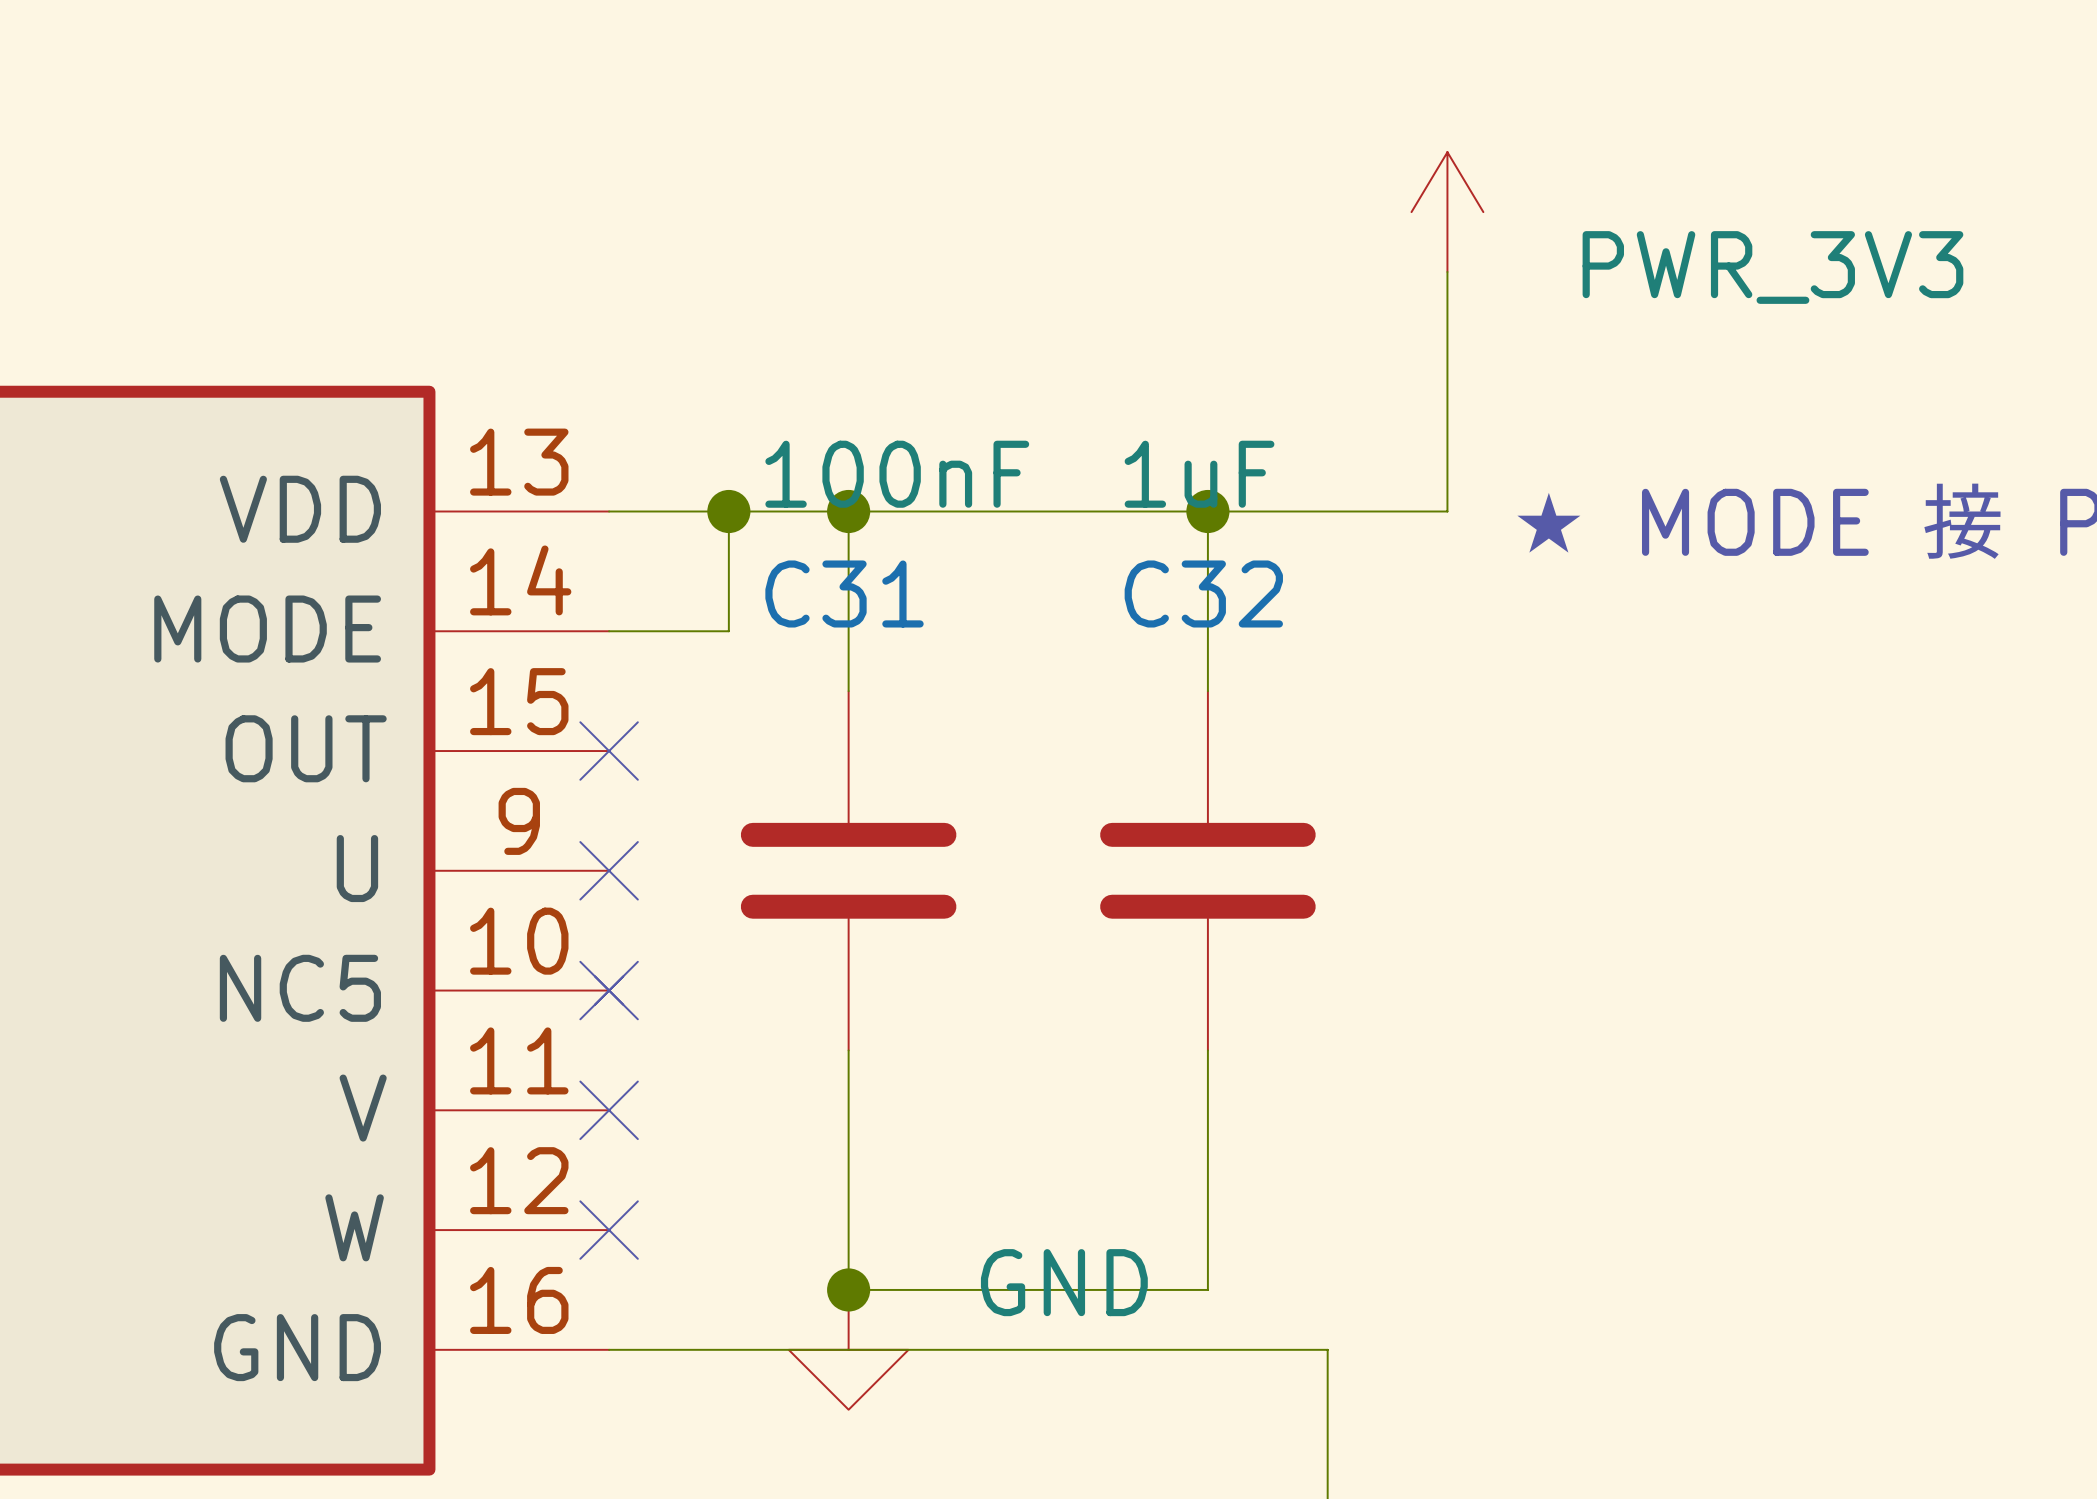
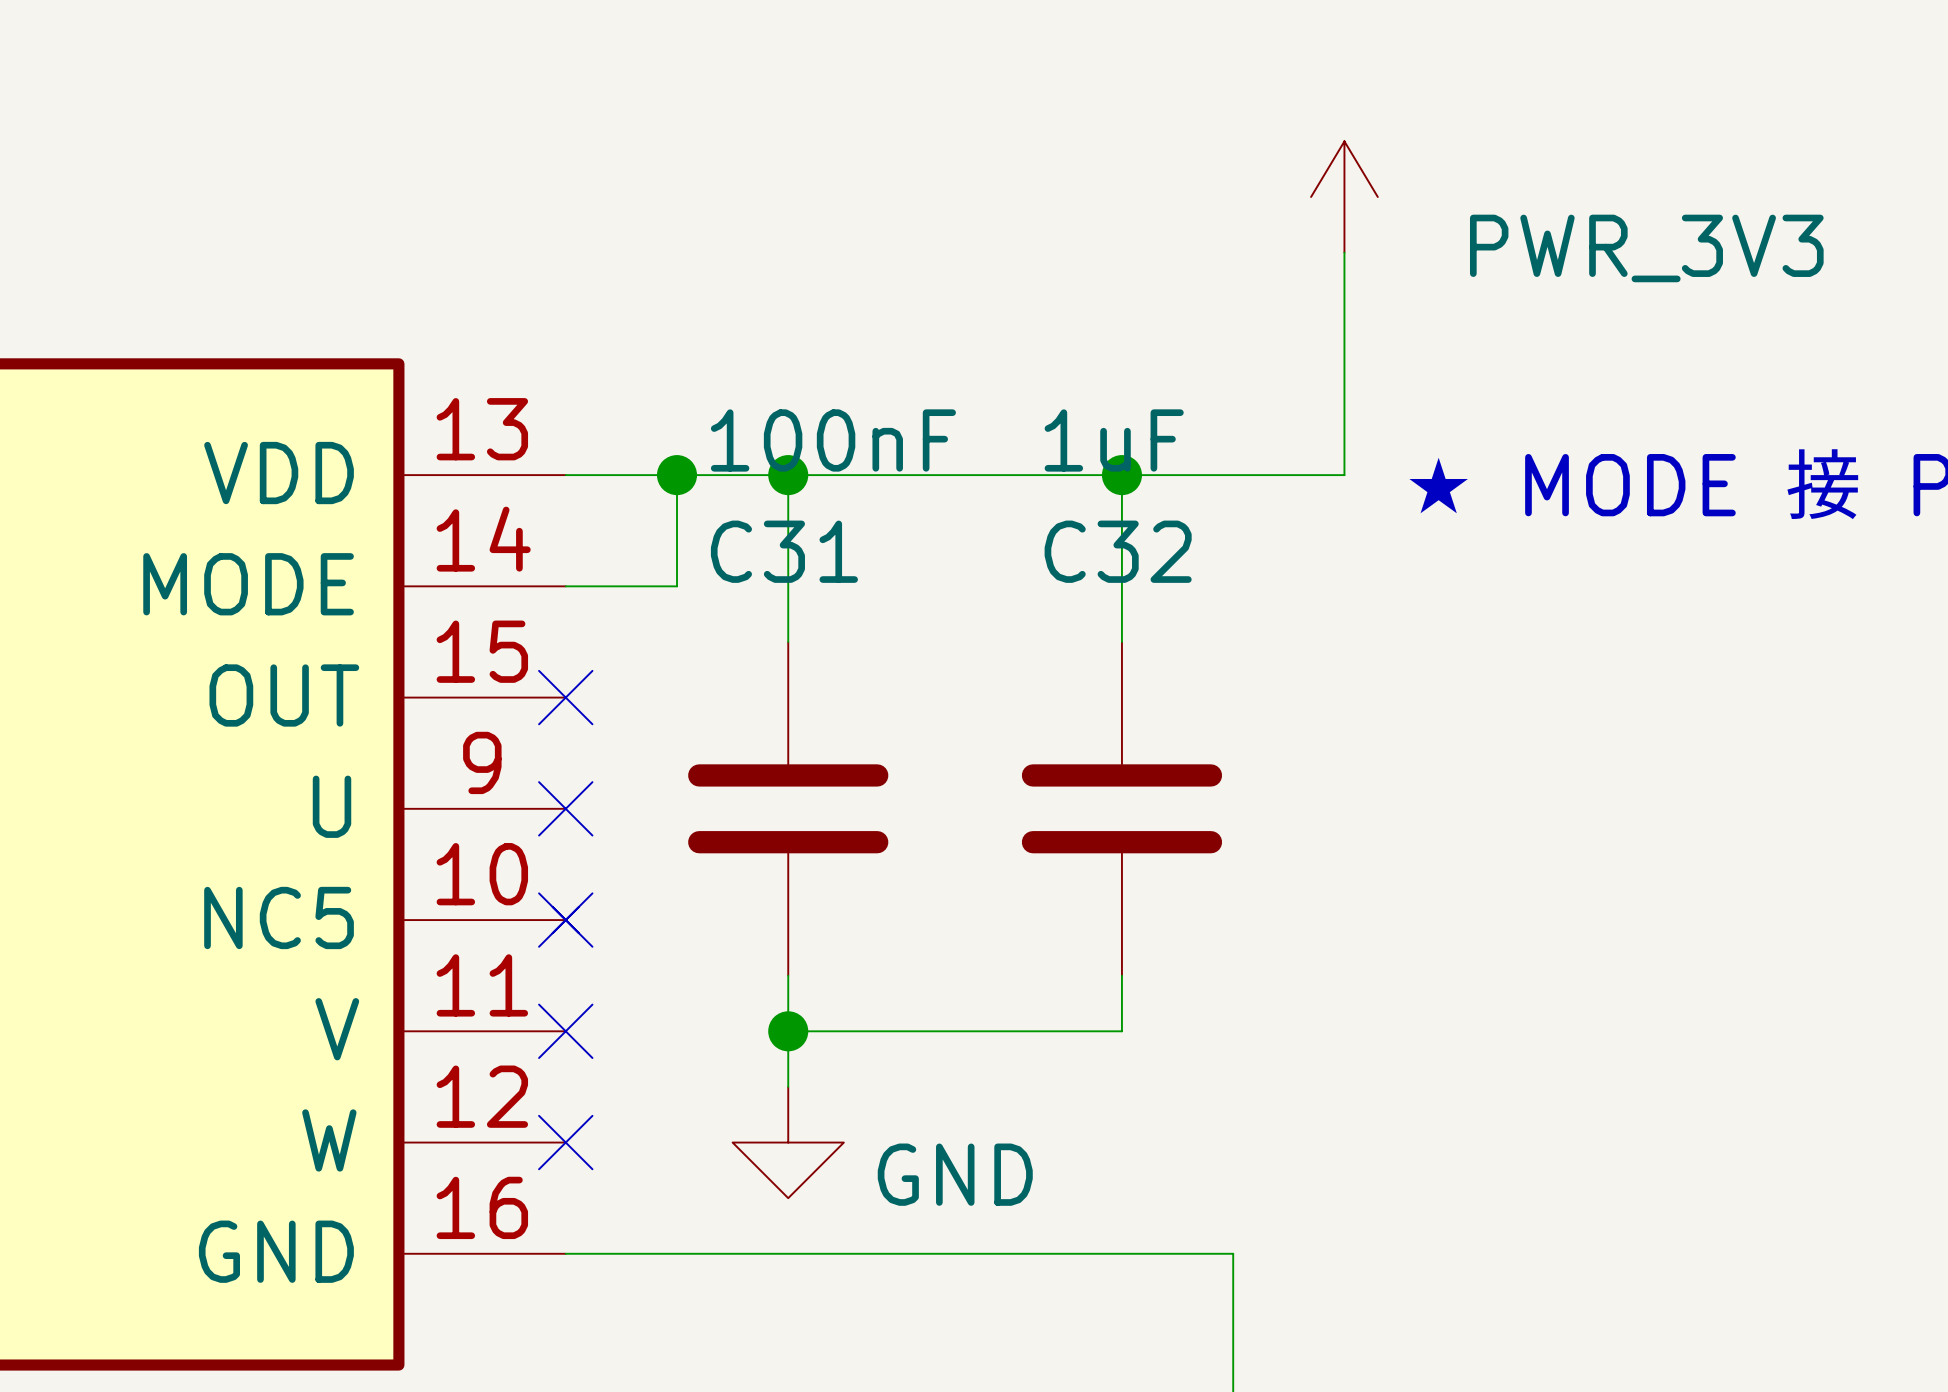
wire: (1207, 1110) (1207, 1289) (848, 1289) (848, 1170) -> (1121, 1031) (788, 1031)
power symbol text position: GND (1064, 1282) -> GND (955, 1174)
junction position: (848, 1289) -> (788, 1031)
power symbol position: GND (848, 1349) -> GND (788, 1142)

